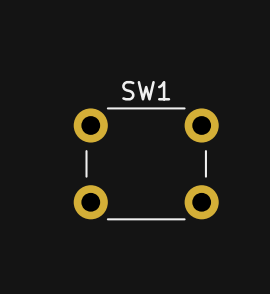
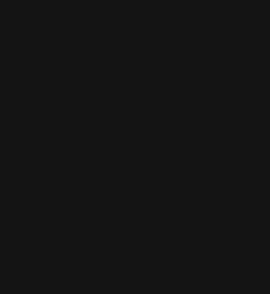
SW1: (146, 163) -> none

